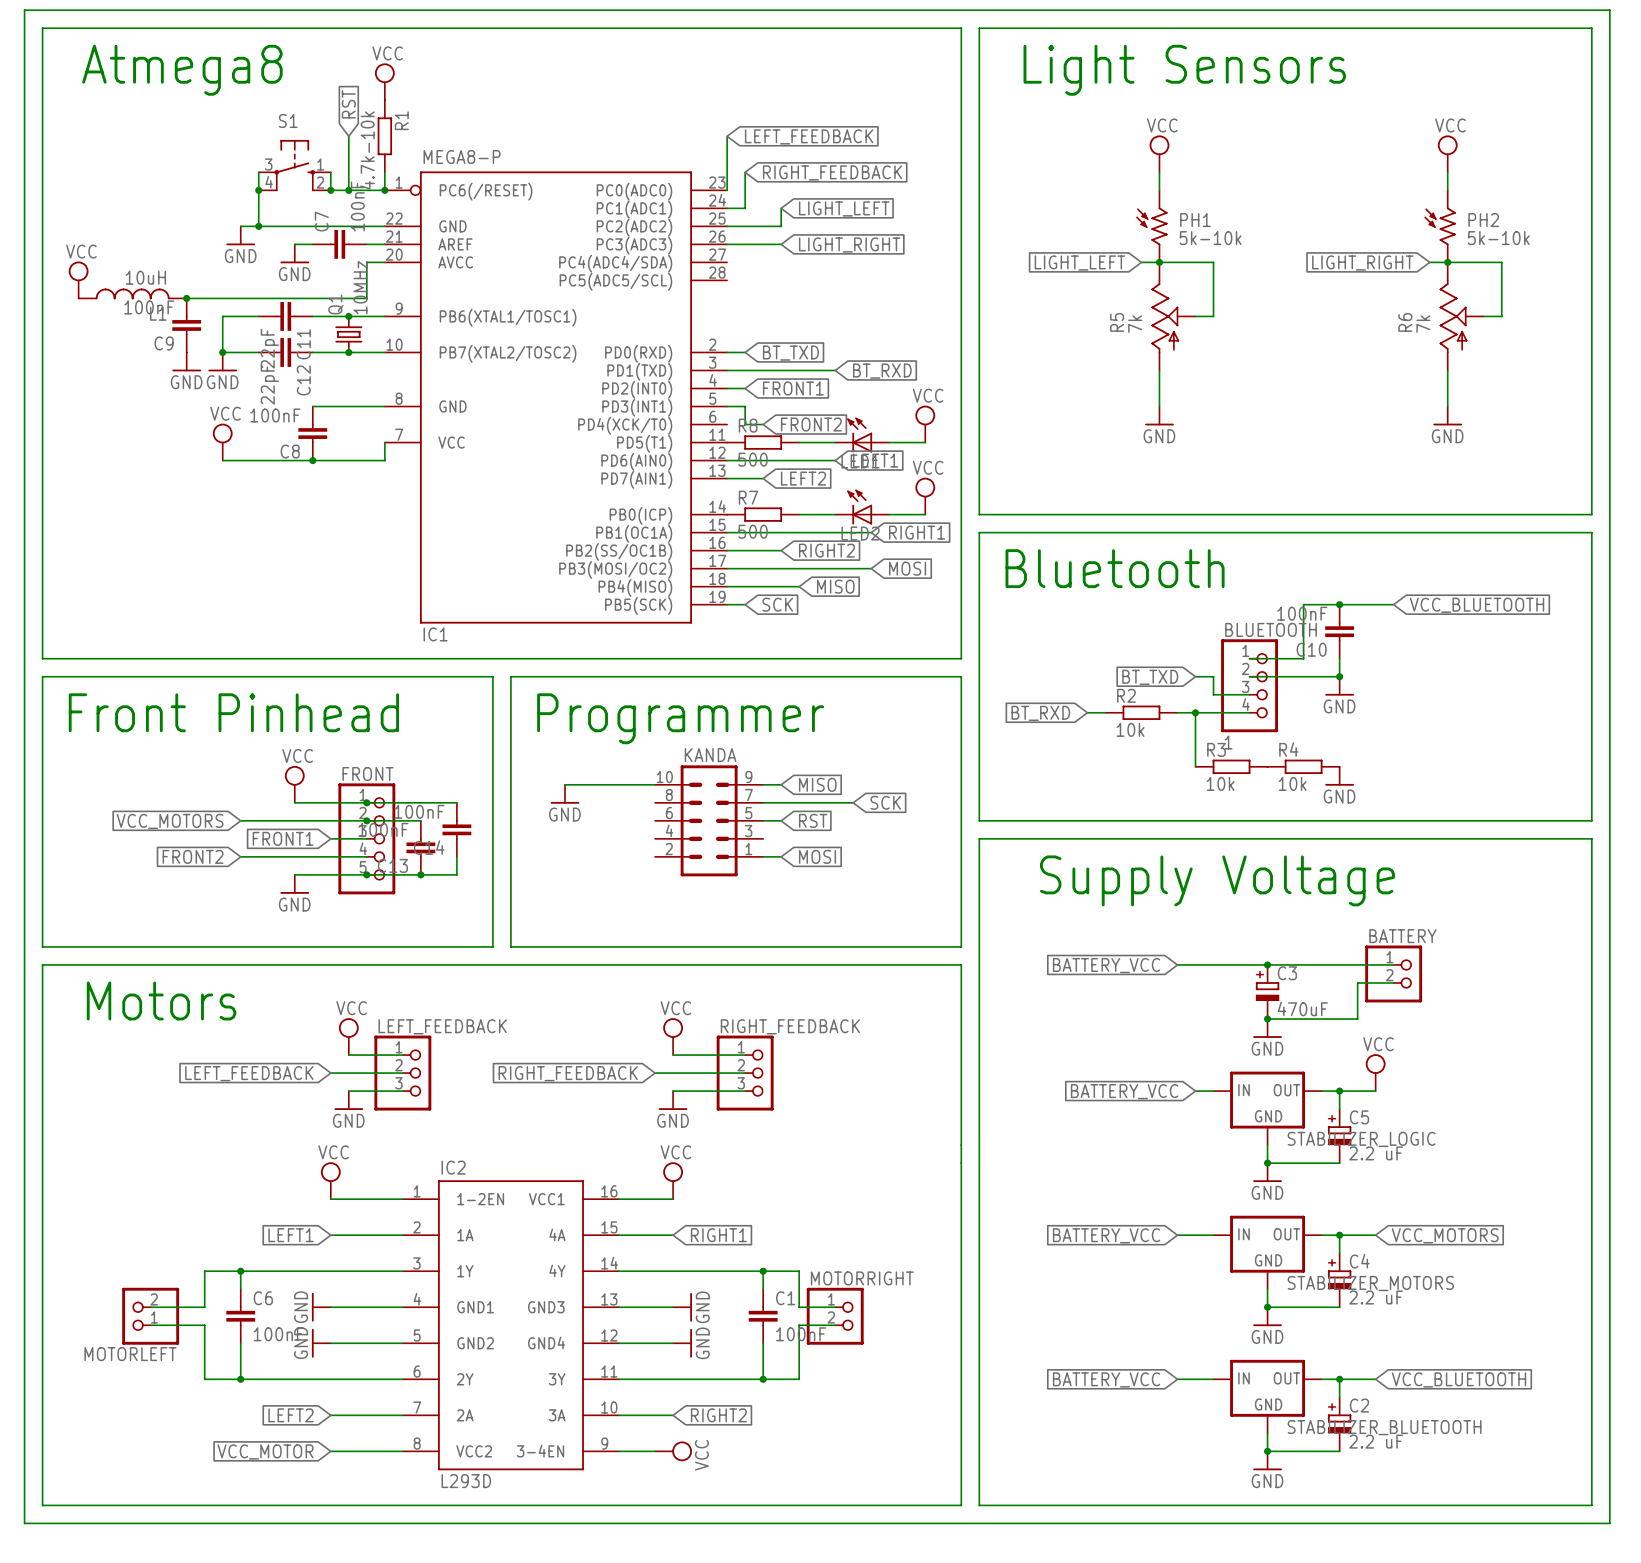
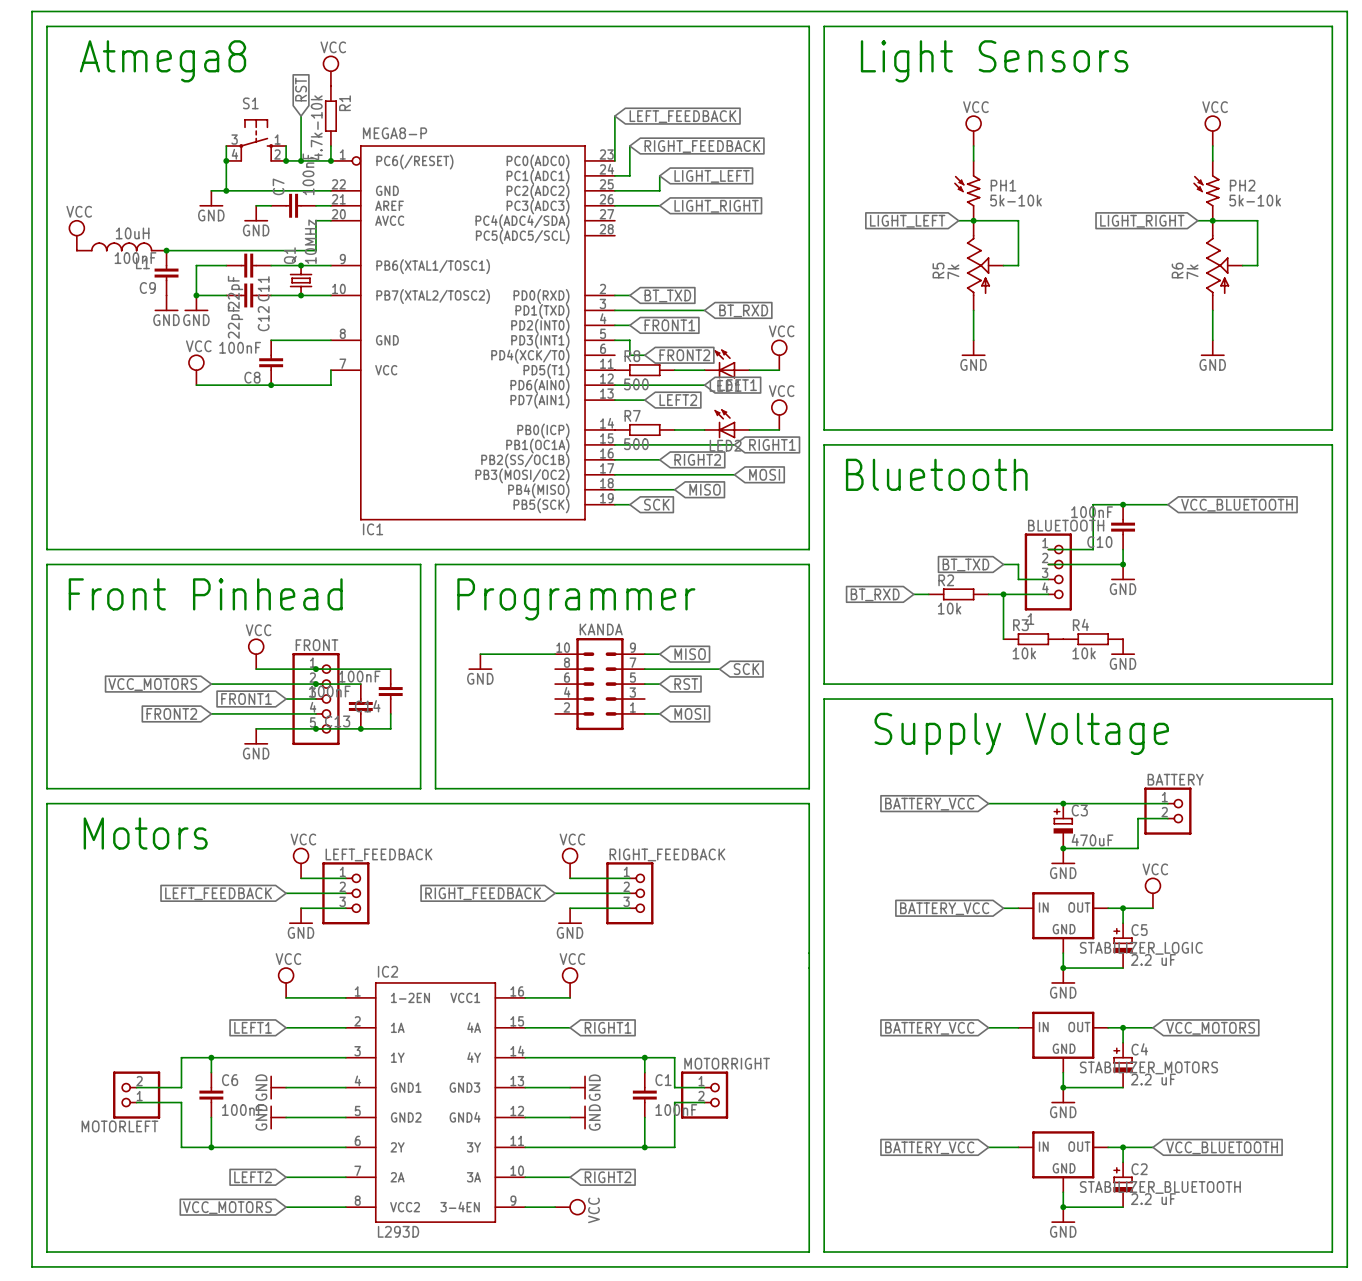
global label: VCC_MOTOR (265, 1451) -> VCC_MOTORS (227, 1207)

